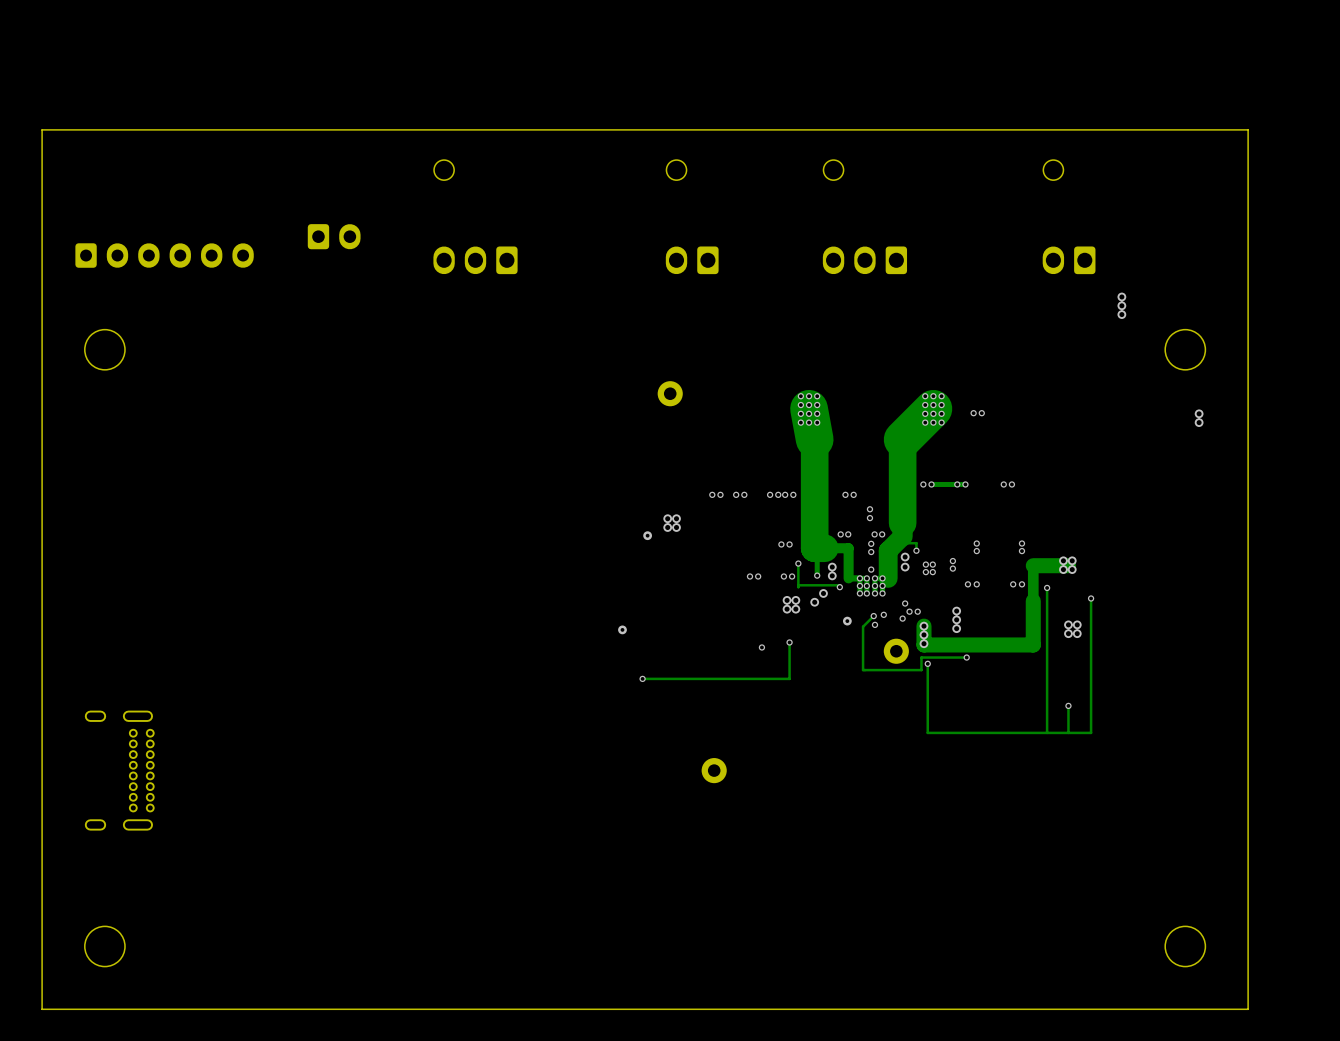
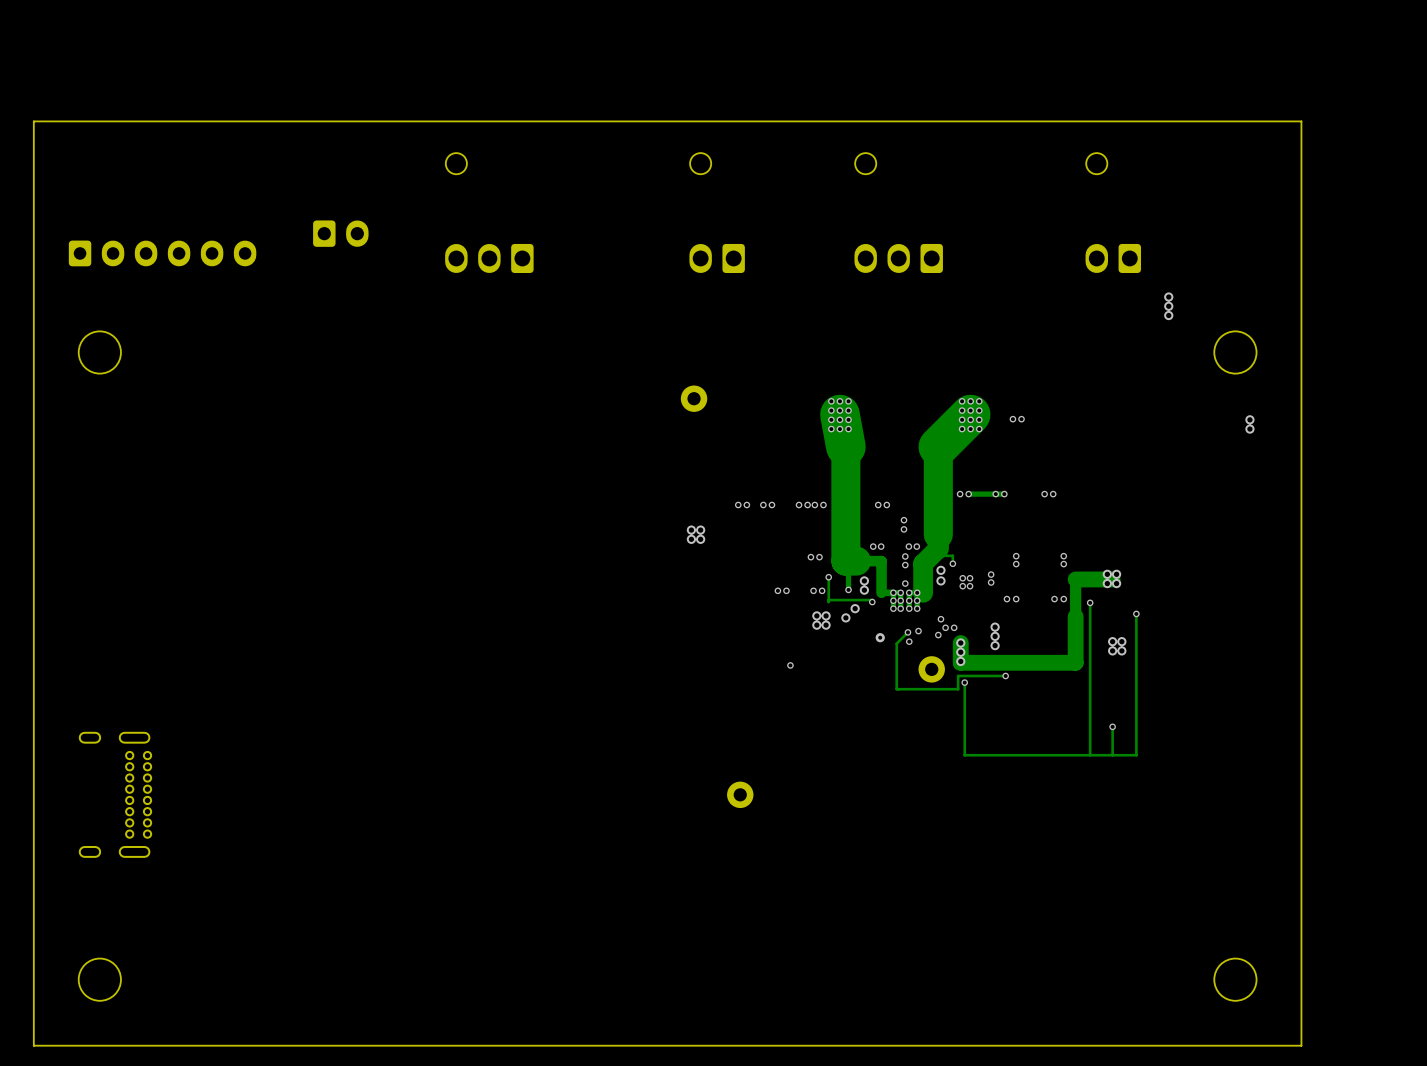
via: (647, 535) -> none
via: (622, 629) -> none
track: (789, 642) (789, 678) (642, 678) -> none
via: (789, 642) -> none
via: (642, 678) -> none

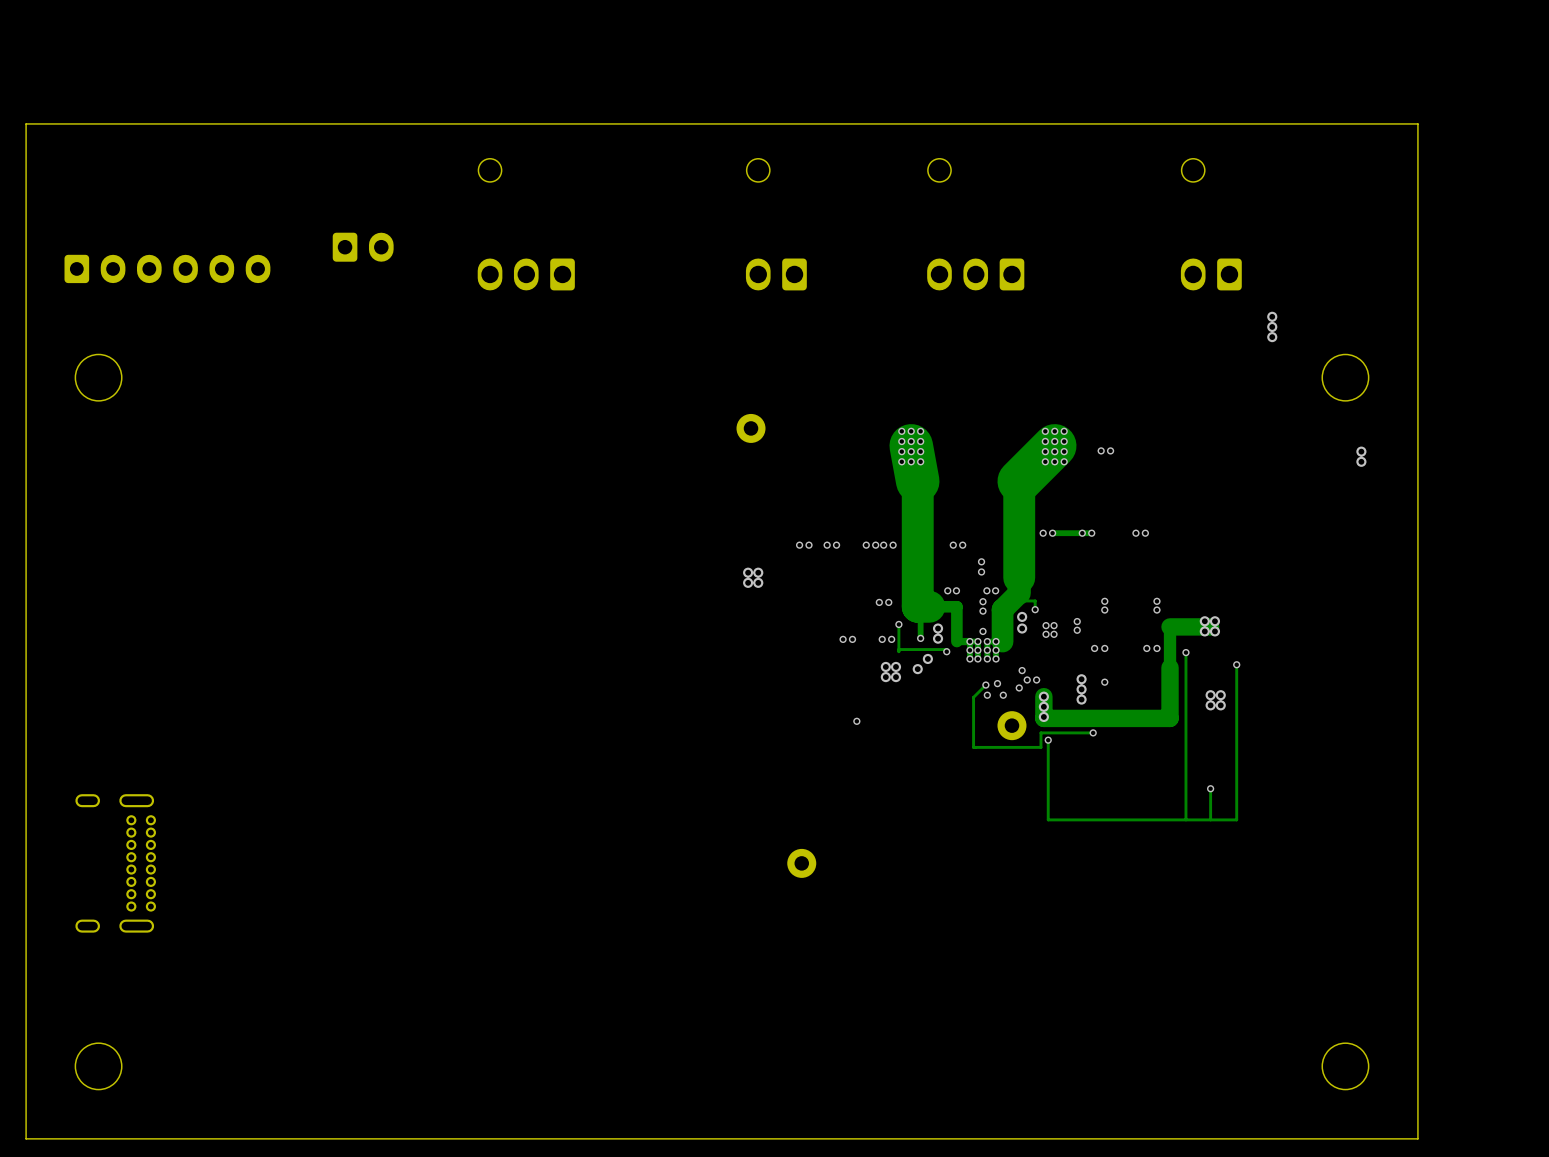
via: none -> (1104, 682)
via: (880, 637) -> none
via: none -> (1003, 695)

